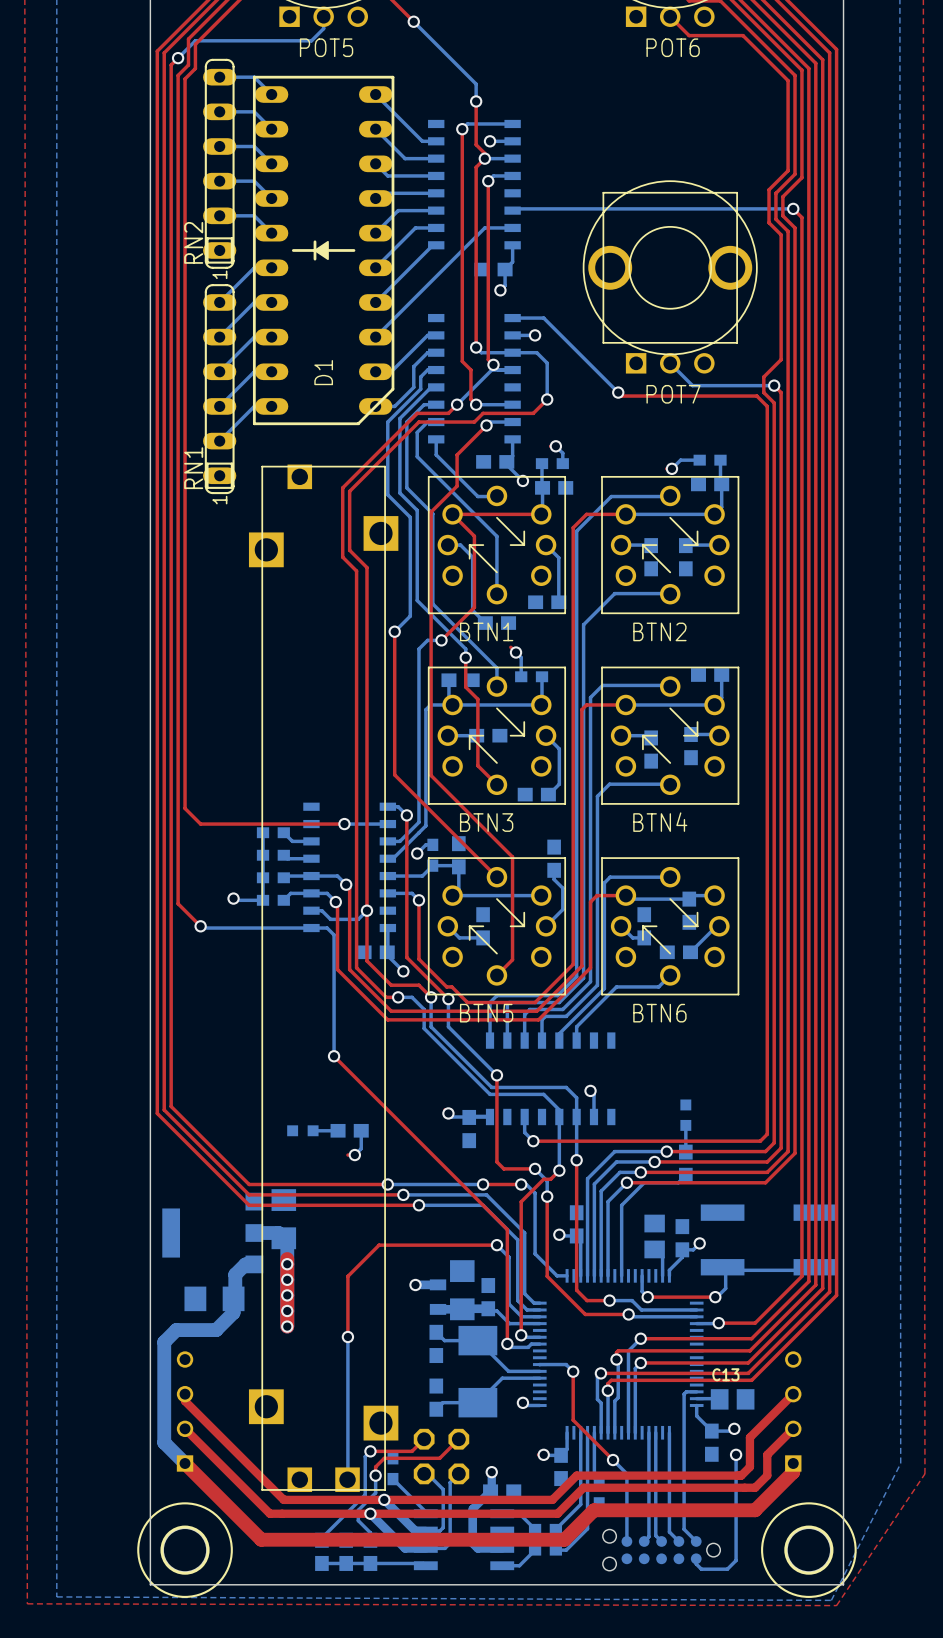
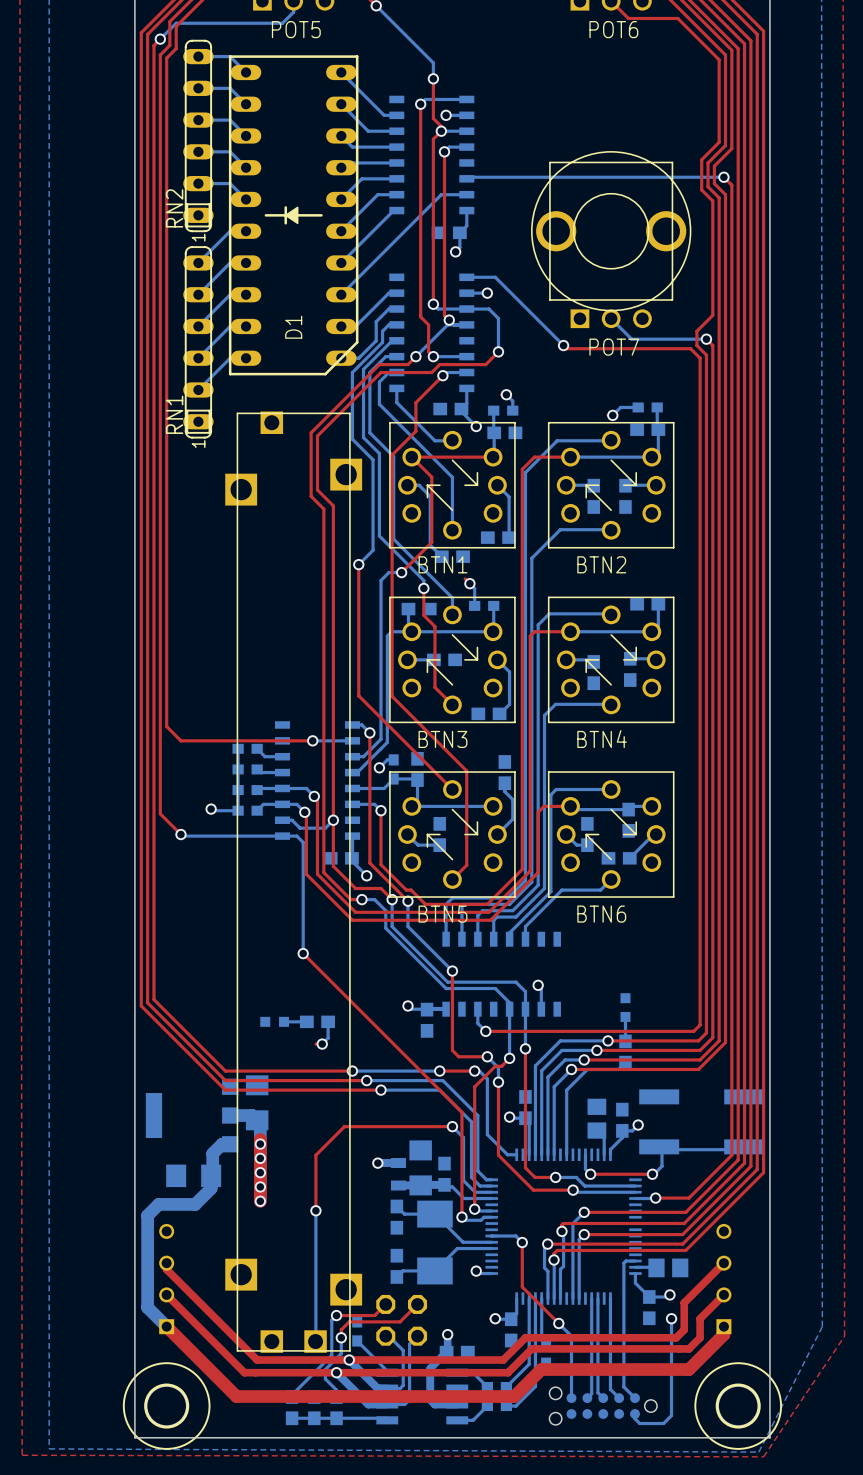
C13 name: C13 (725, 1374) -> none

